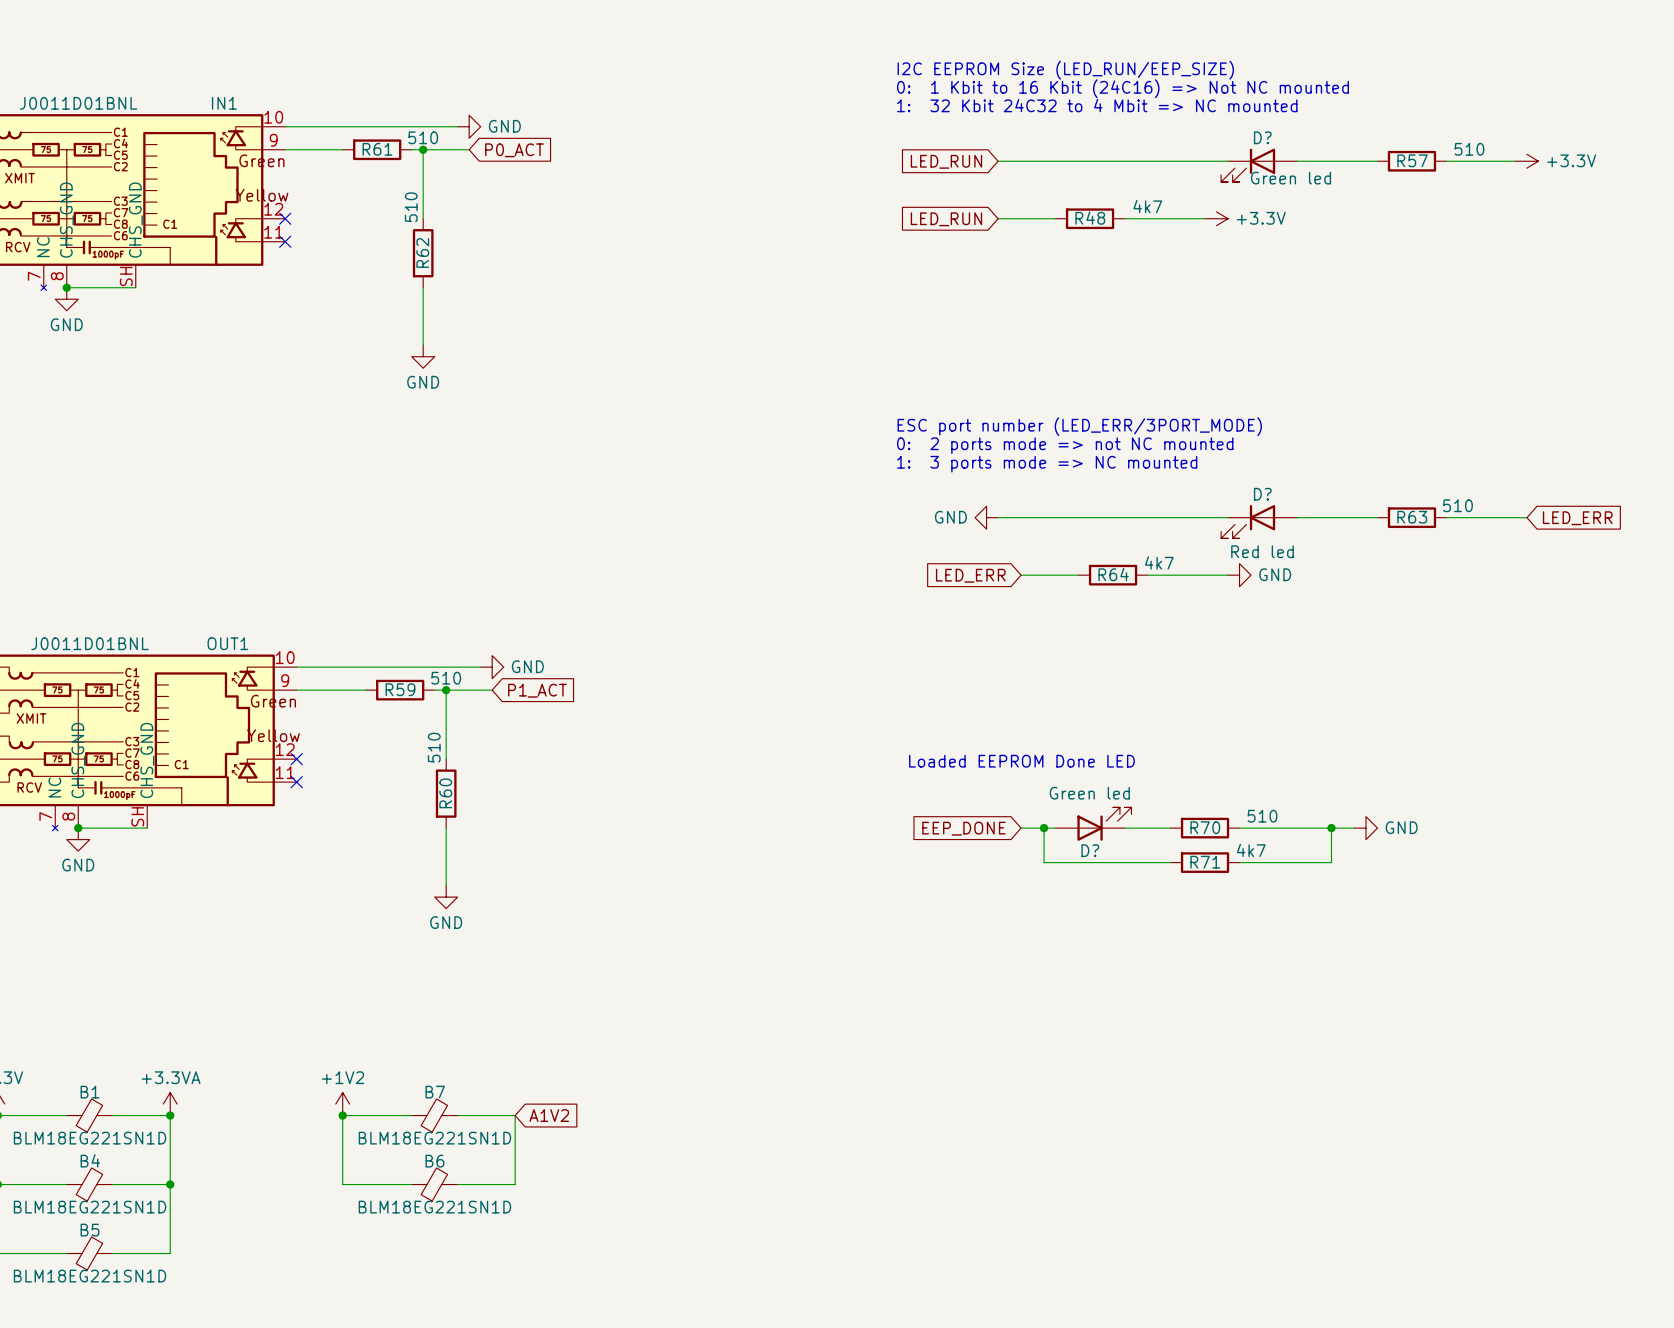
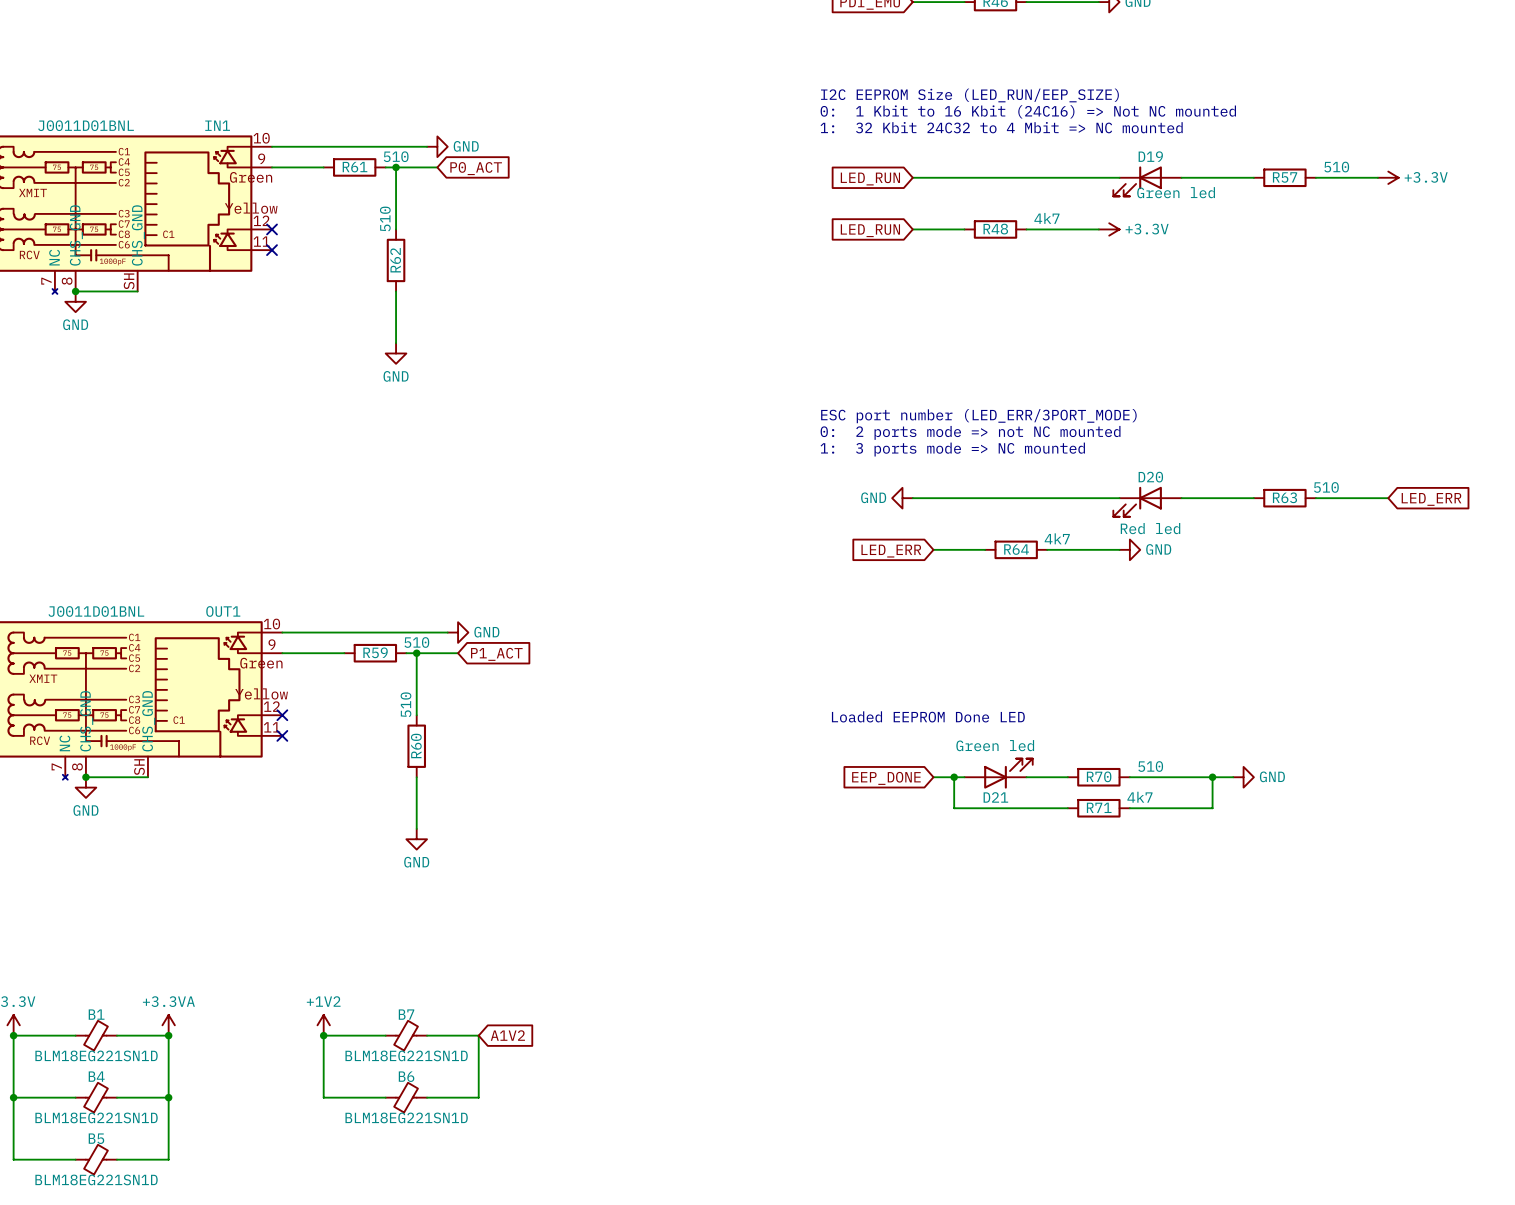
D? name: D? (1262, 137) -> D19 (1150, 156)
D? name: D? (1262, 494) -> D20 (1150, 477)
D? name: D? (1090, 850) -> D21 (995, 797)

